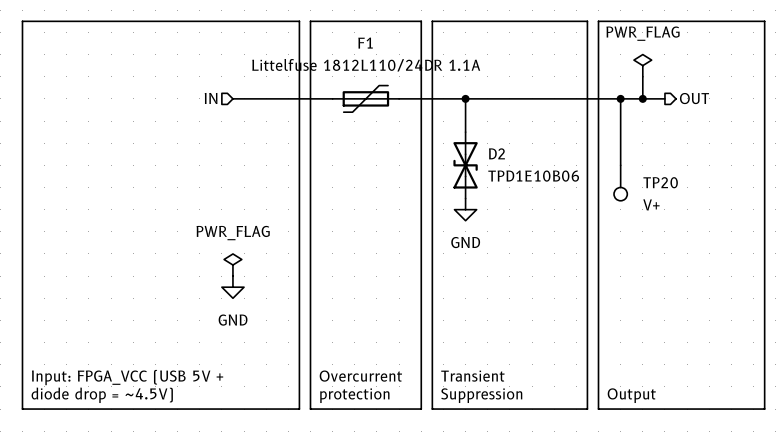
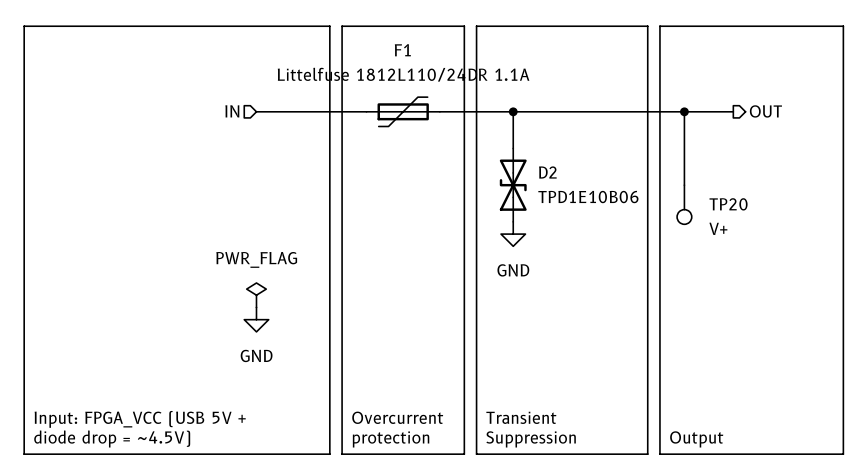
power symbol: PWR_FLAG (642, 65) -> none
wire: (642, 76) (642, 98) -> none
junction: (642, 98) -> none

